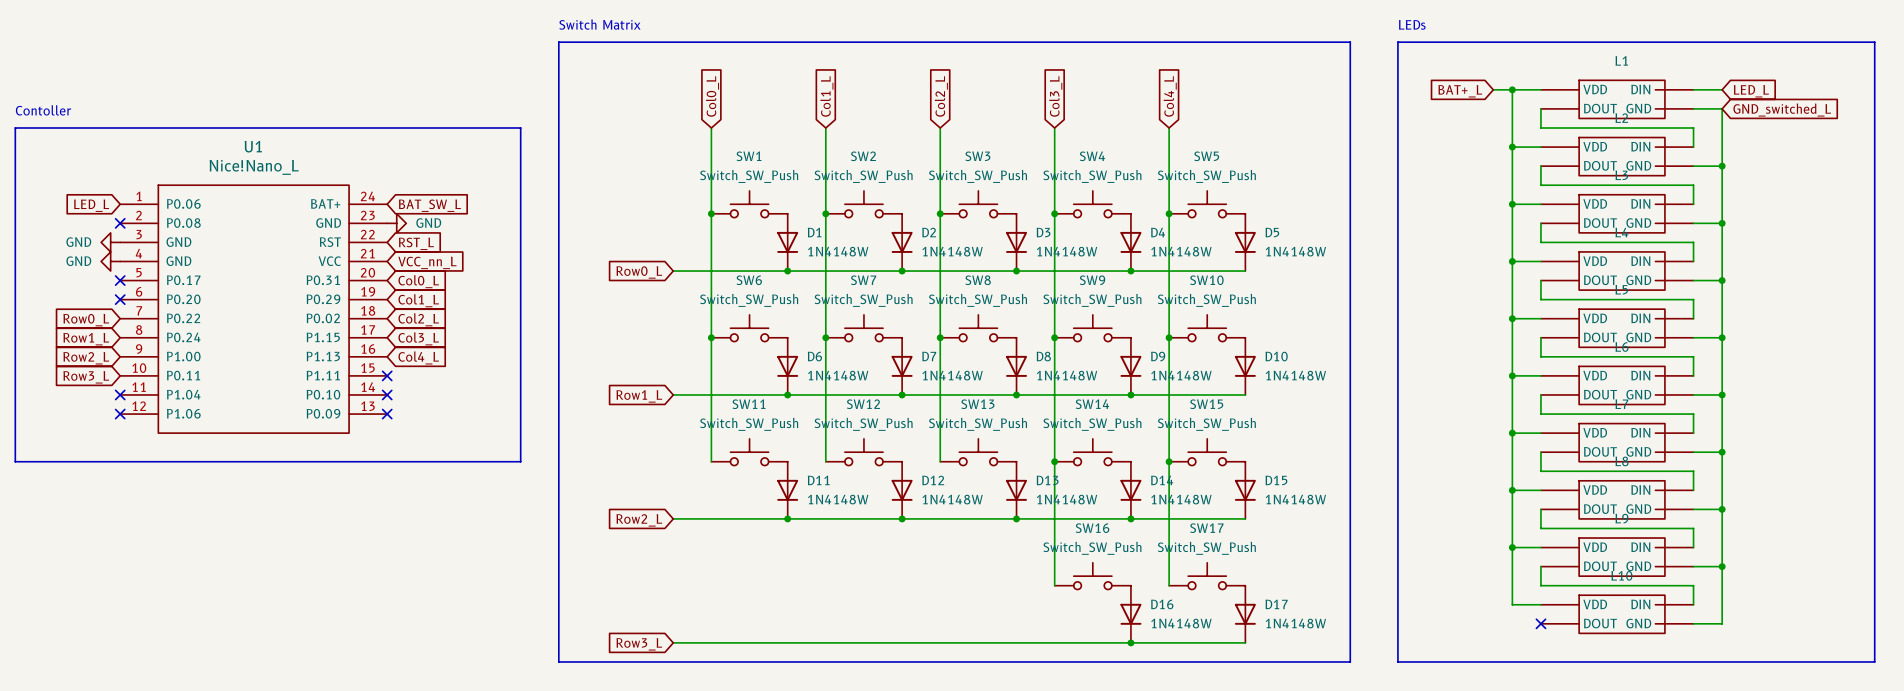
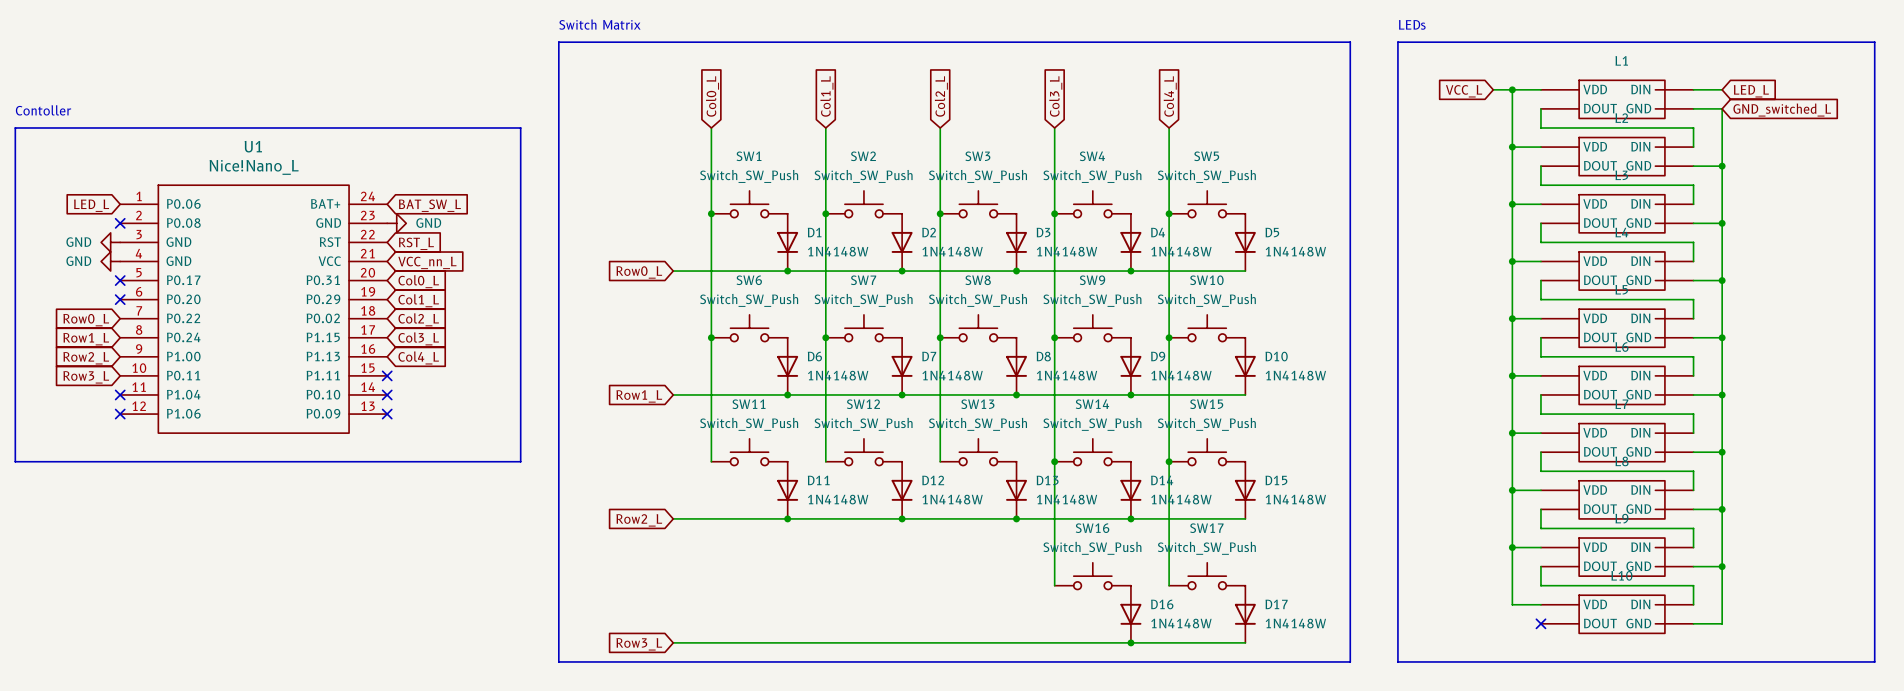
global label: BAT+_L (1460, 91) -> VCC_L (1464, 91)

